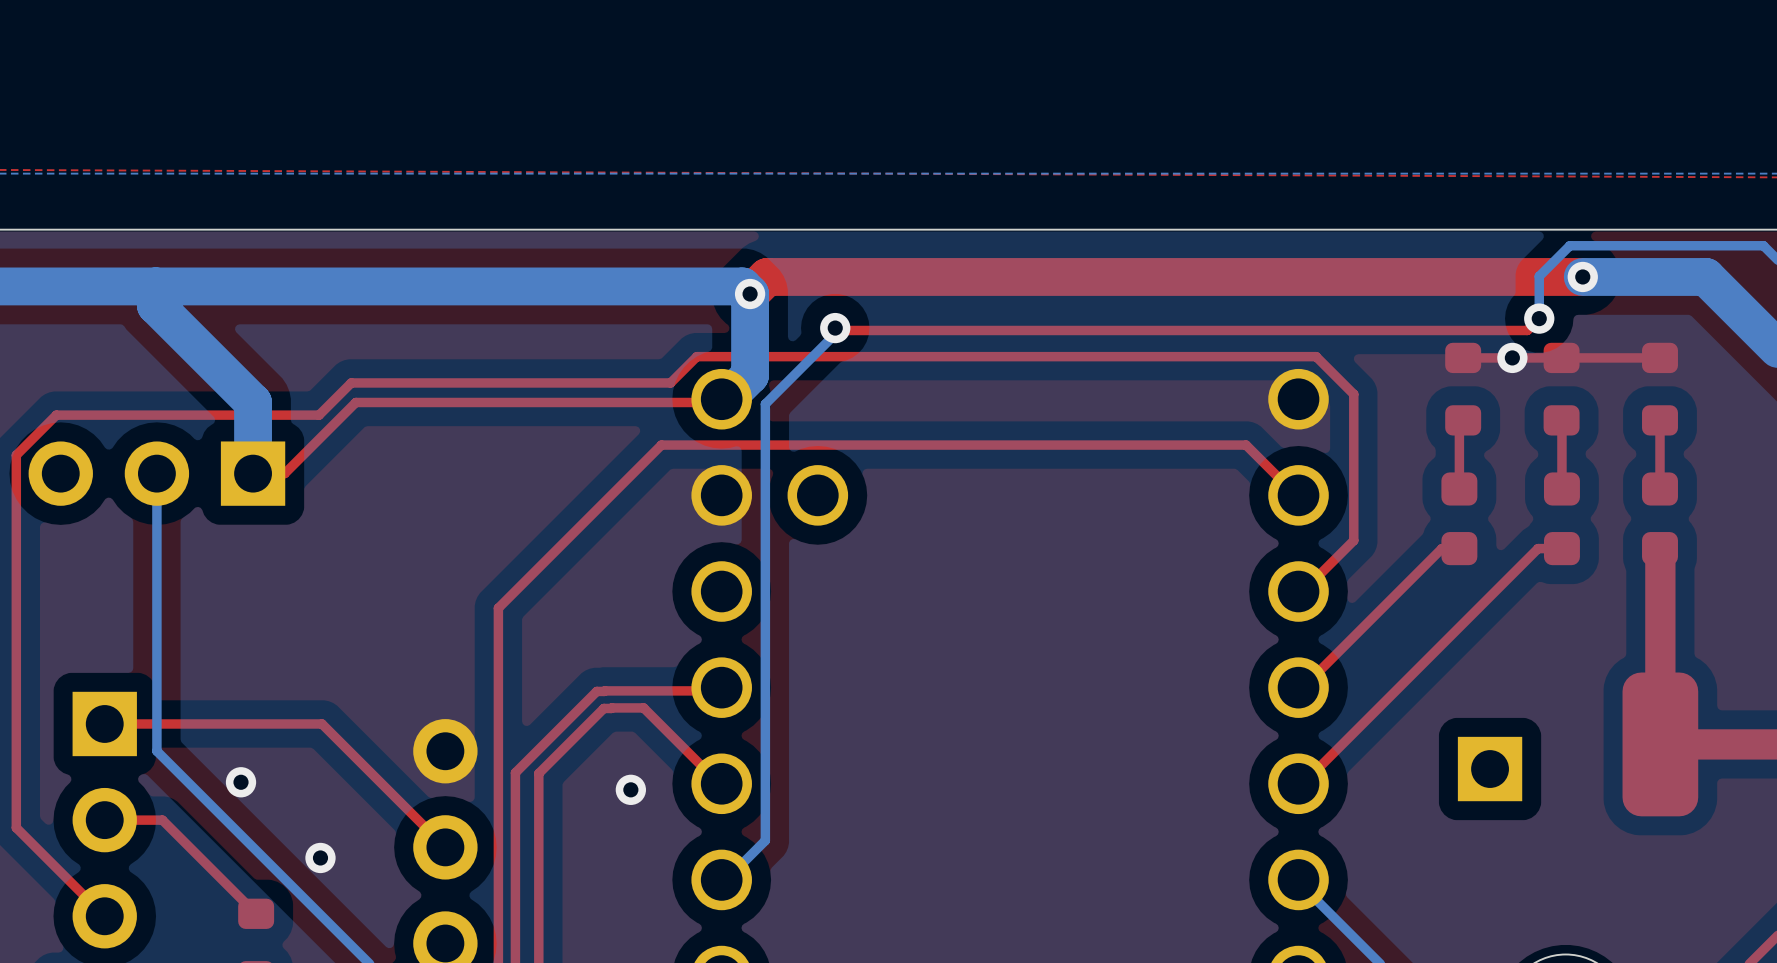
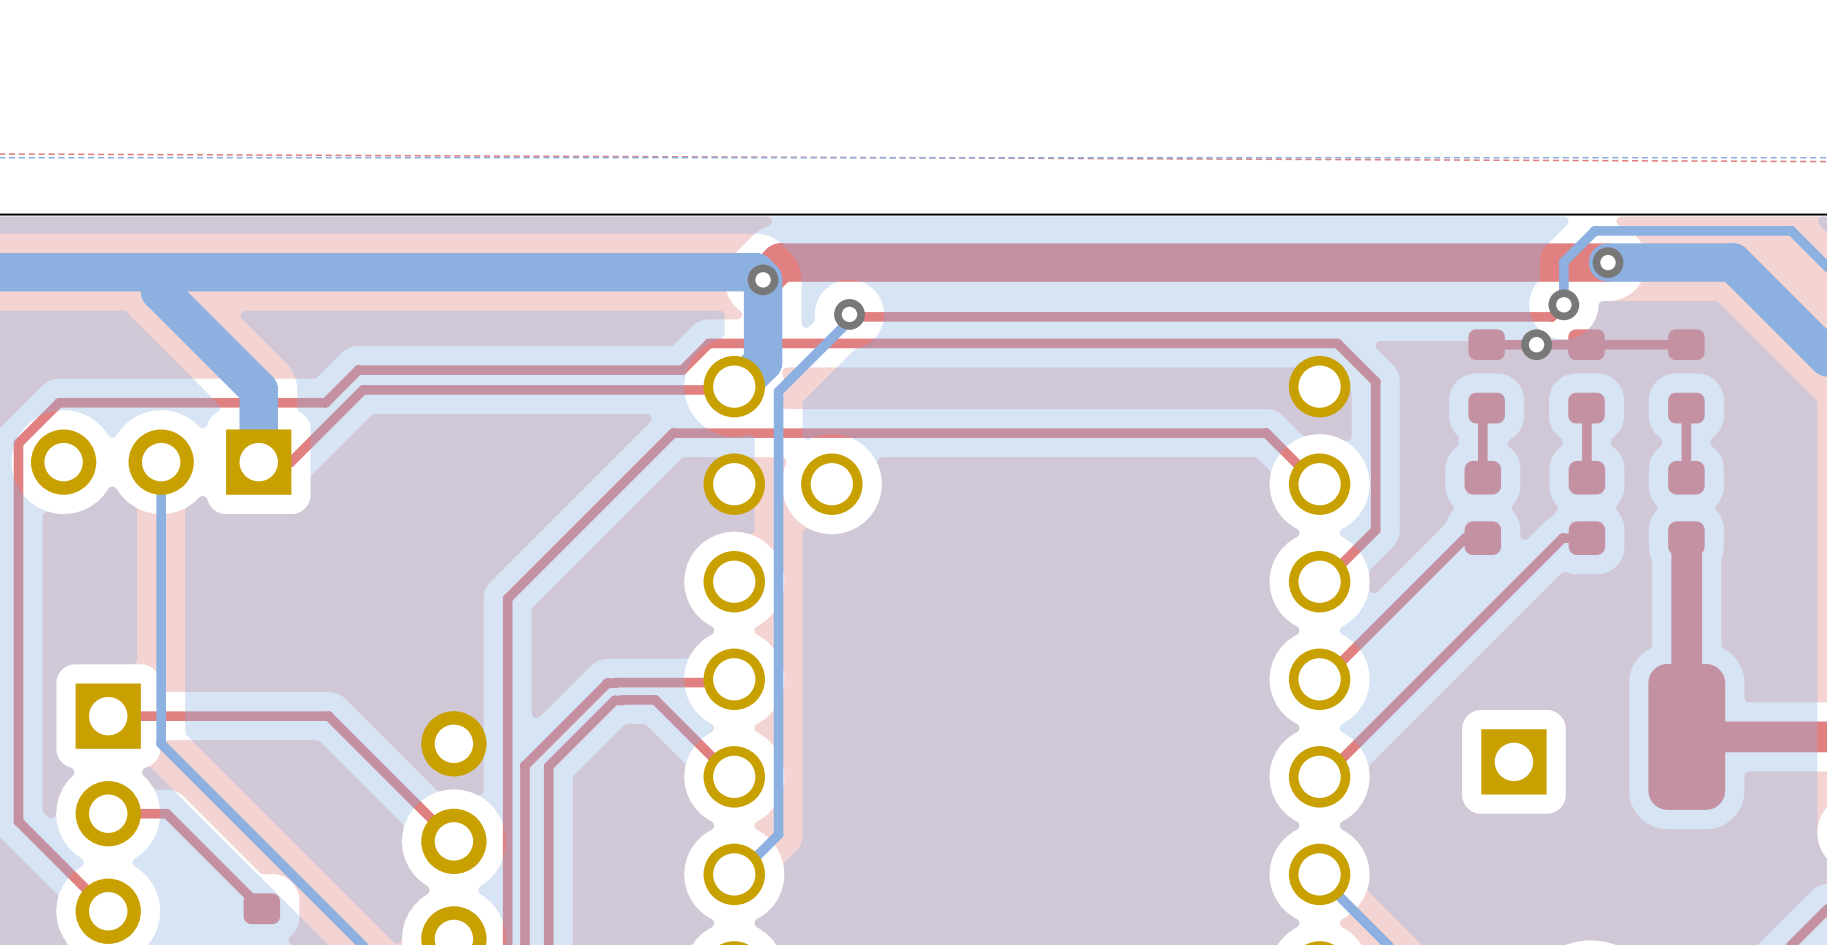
via: (241, 782) -> none
via: (630, 789) -> none
via: (320, 857) -> none

